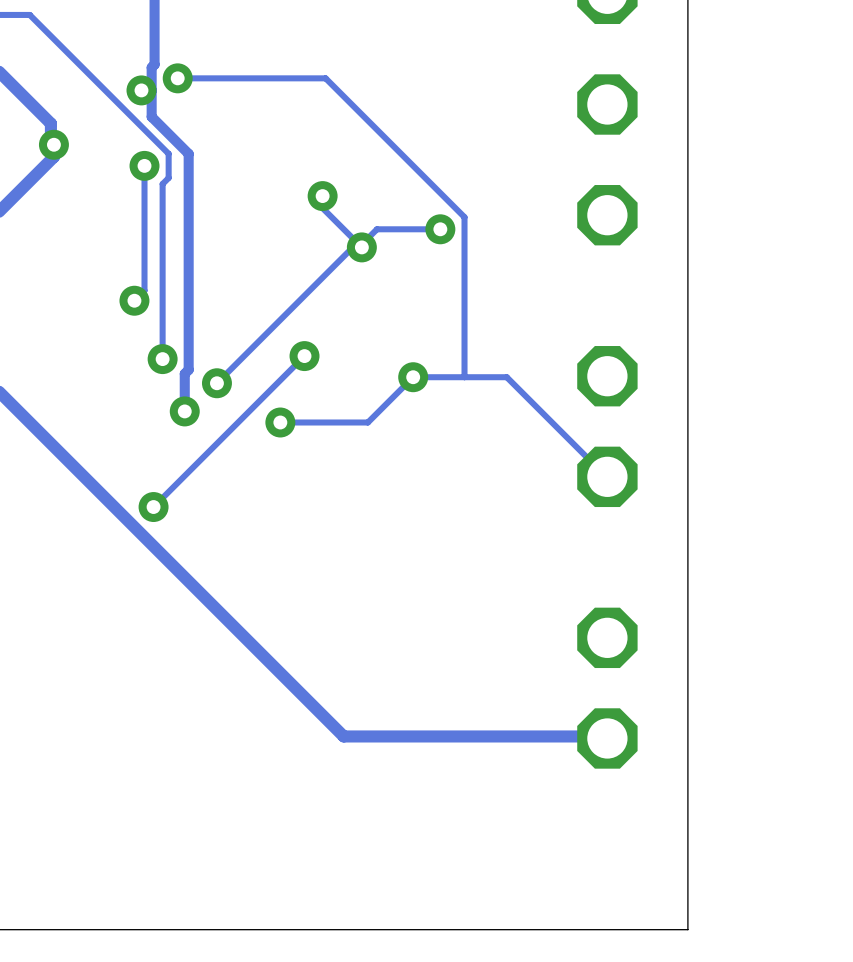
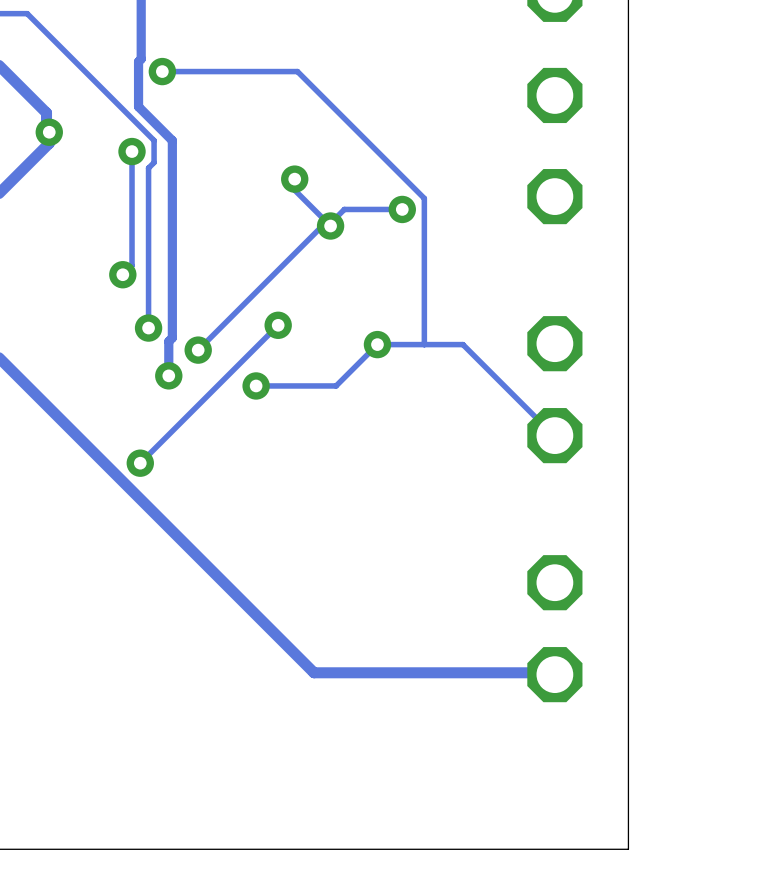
via: (141, 90) -> none

